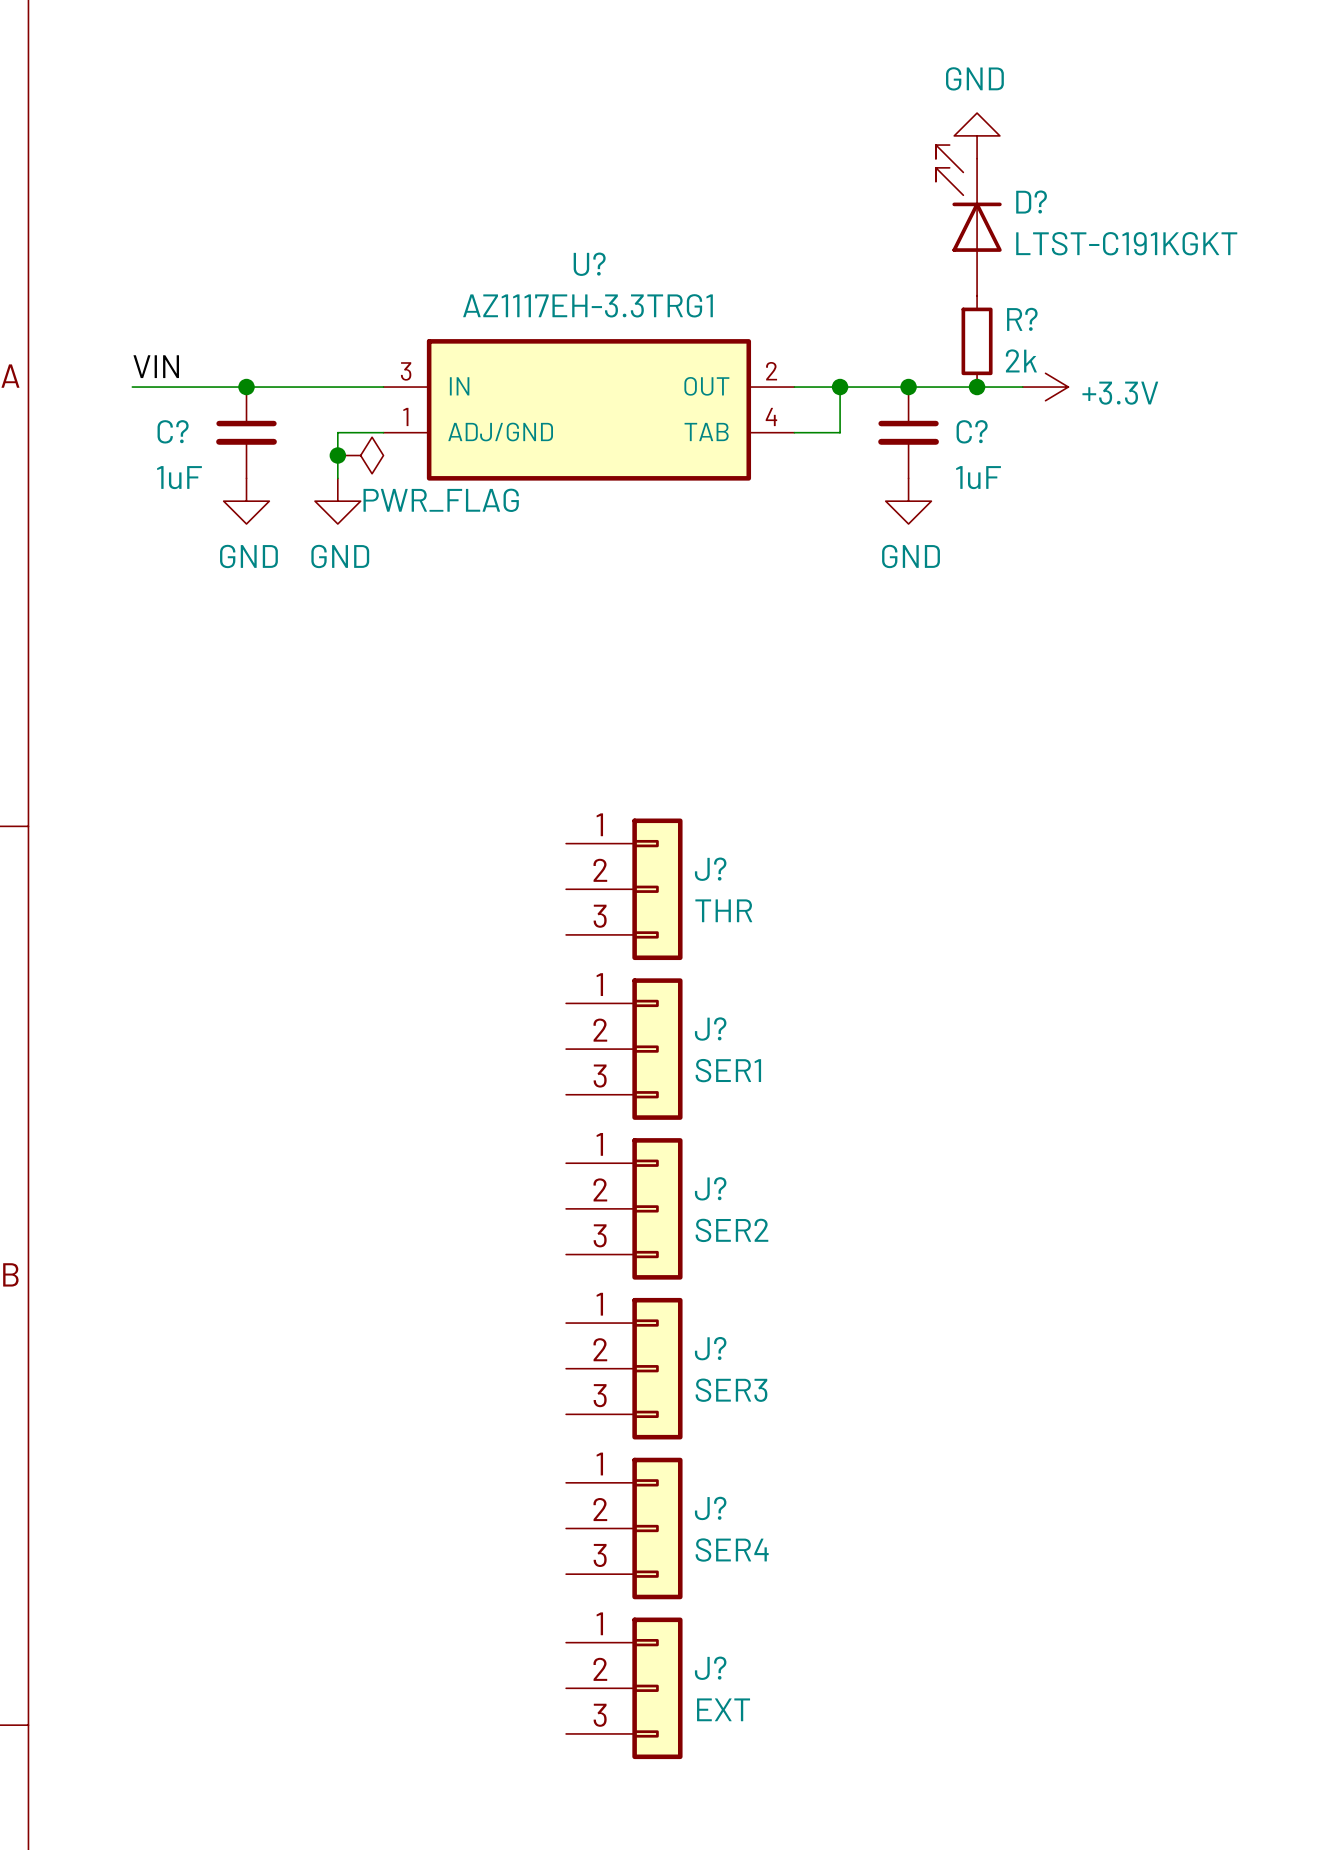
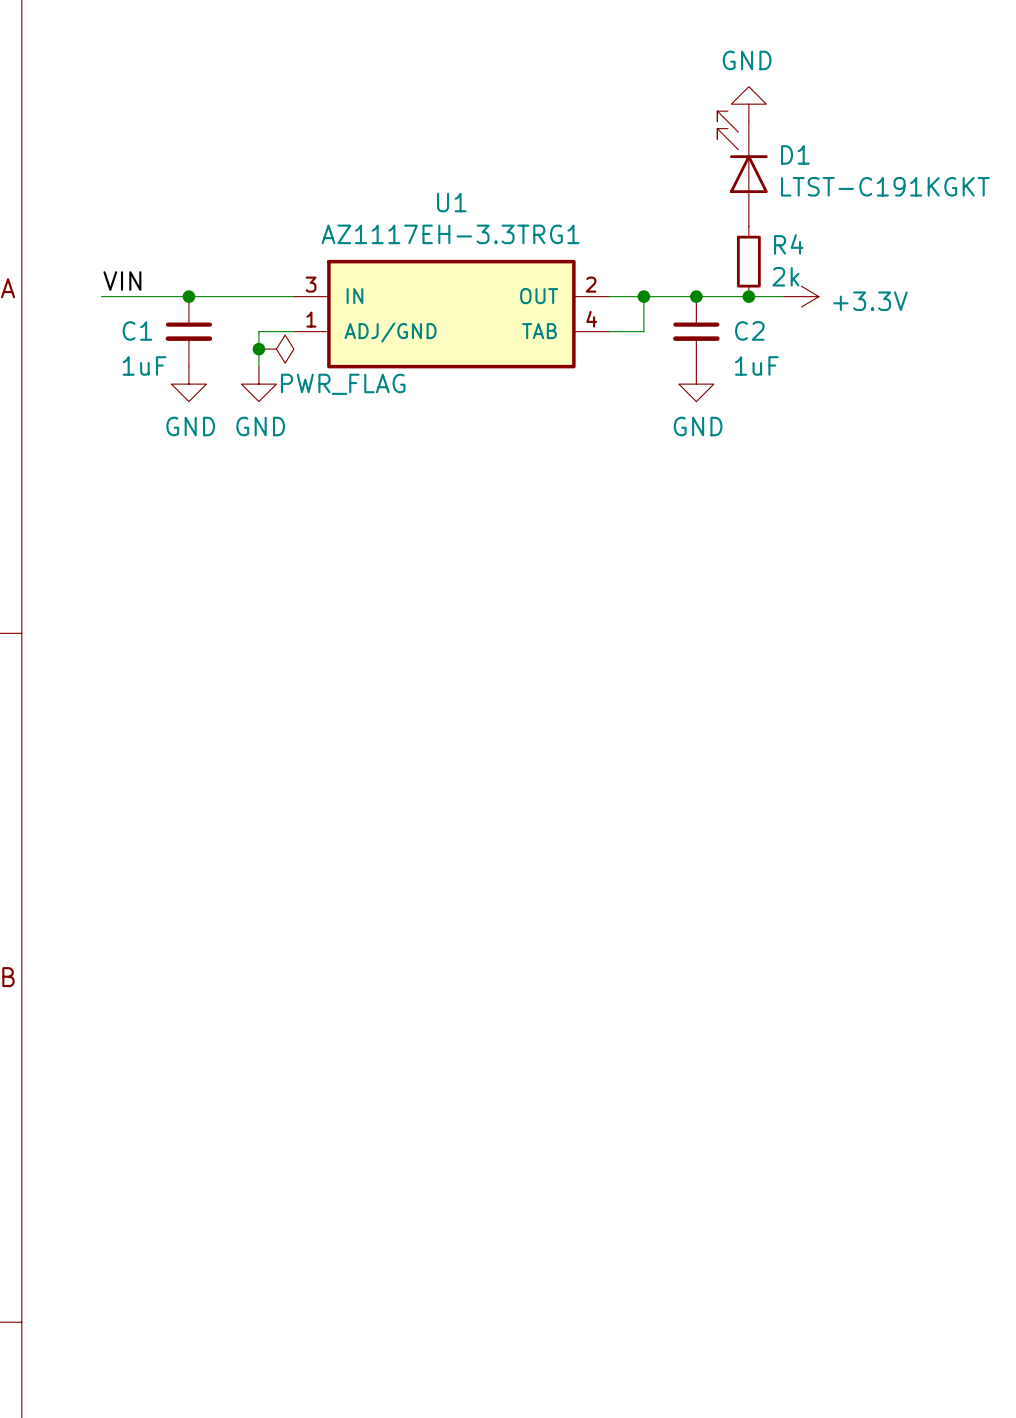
D? name: D? (1031, 202) -> D1 (795, 154)
U? name: U? (589, 264) -> U1 (451, 202)
R? name: R? (1022, 319) -> R4 (788, 244)
C? name: C? (173, 431) -> C1 (137, 330)
C? name: C? (972, 431) -> C2 (749, 330)
J?: THR (624, 889) -> none
J?: SER1 (624, 1049) -> none
J?: SER2 (624, 1208) -> none
J?: SER3 (624, 1368) -> none
J?: SER4 (624, 1528) -> none
J?: EXT (624, 1688) -> none

